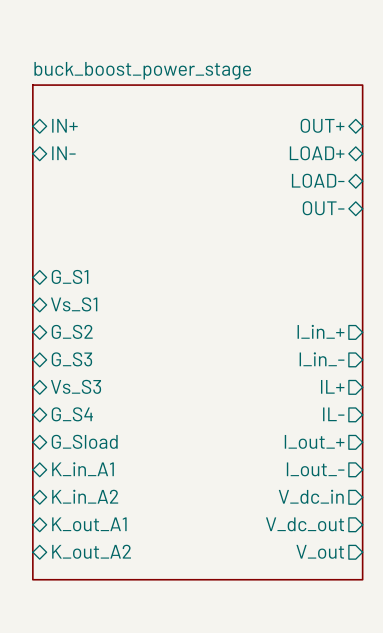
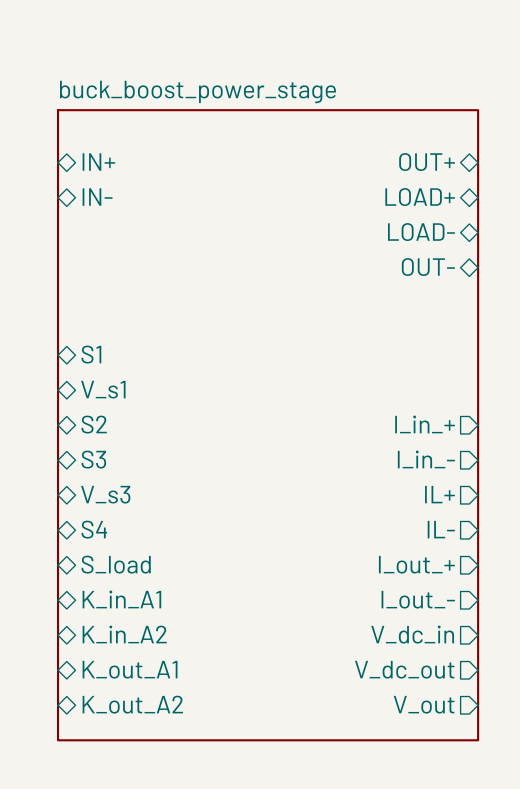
sheet pin: G_S1 (70, 276) -> S1 (91, 354)
sheet pin: Vs_S1 (74, 304) -> V_s1 (103, 389)
sheet pin: G_S2 (72, 331) -> S2 (94, 424)
sheet pin: G_S3 (71, 359) -> S3 (93, 459)
sheet pin: Vs_S3 (76, 386) -> V_s3 (105, 494)
sheet pin: G_S4 (72, 414) -> S4 (94, 529)
sheet pin: G_Sload (84, 441) -> S_load (116, 564)

